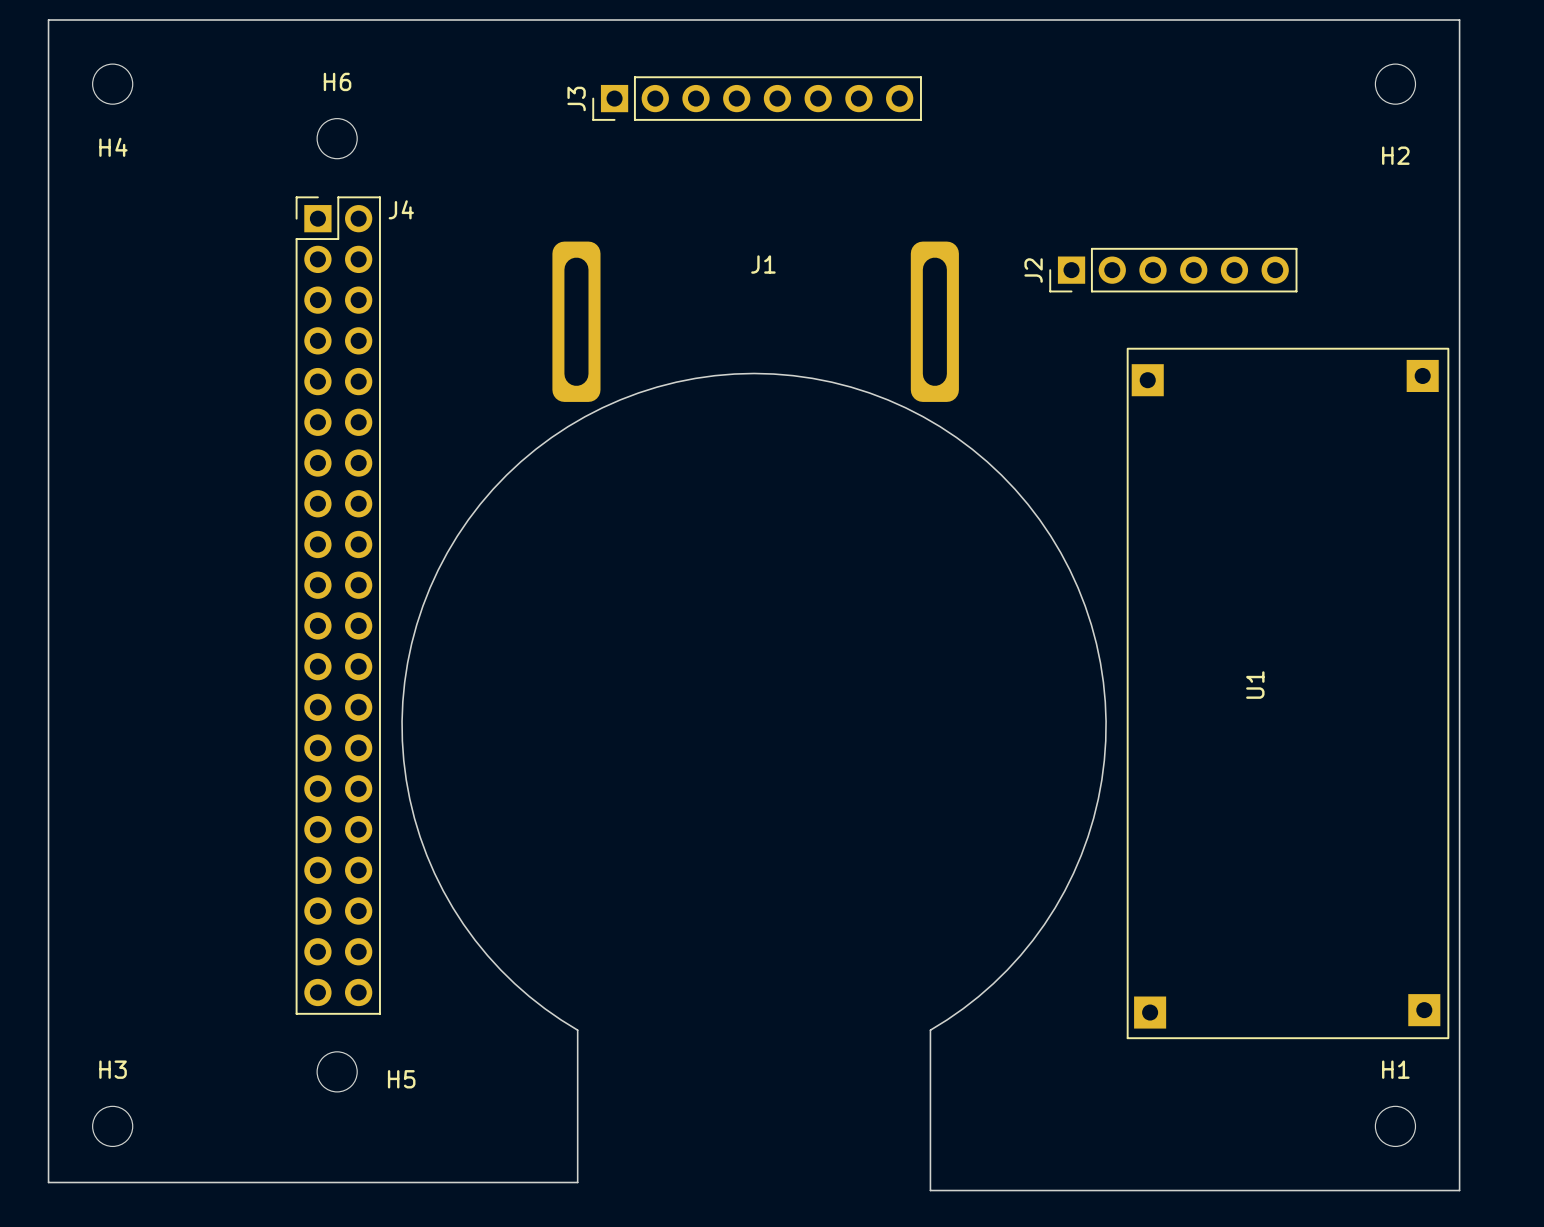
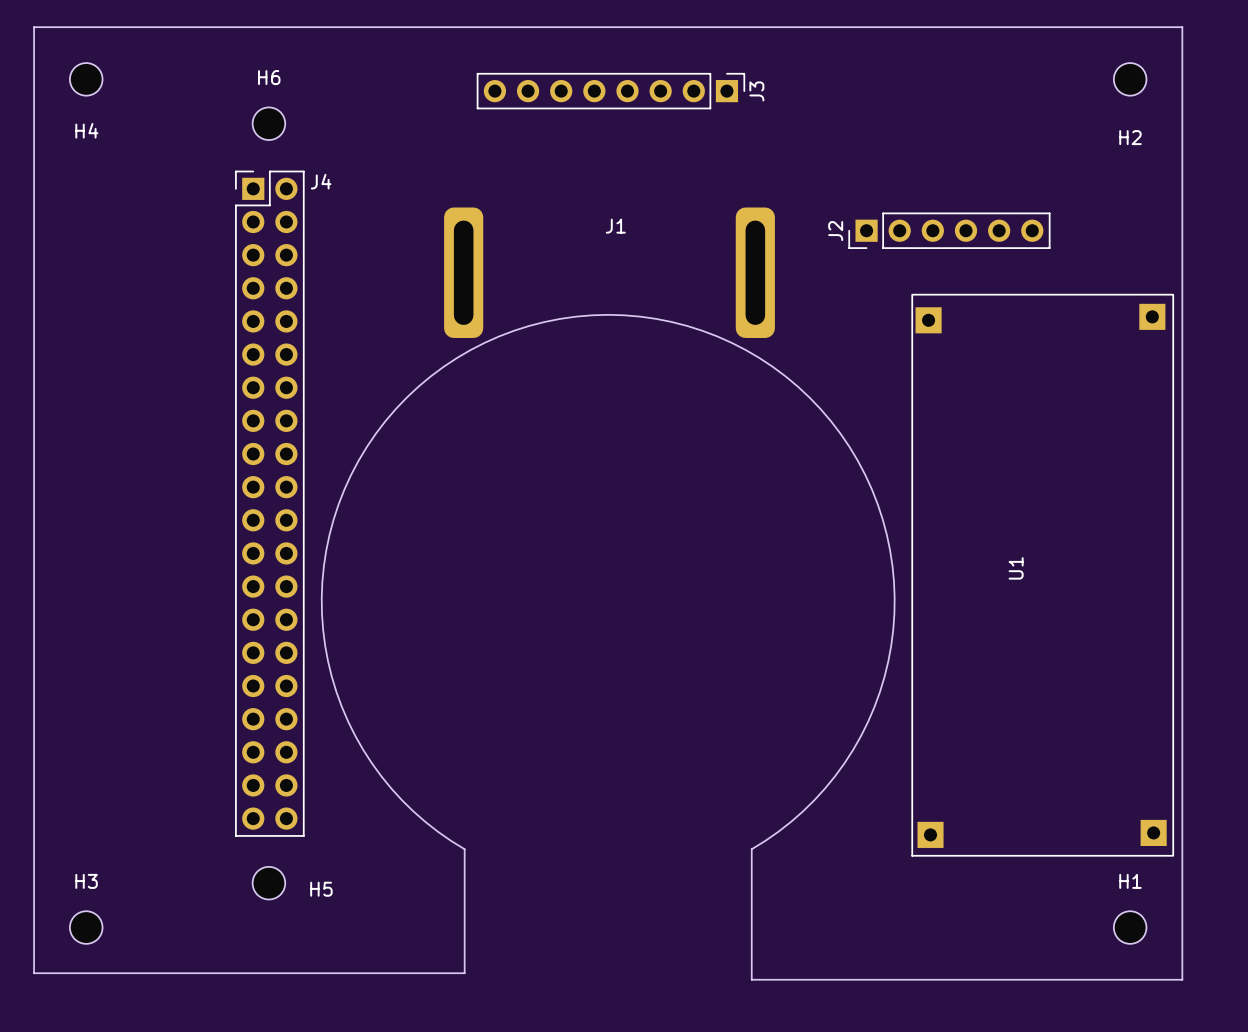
J3 rotation: 0° (757, 98) -> 180° (610, 91)

